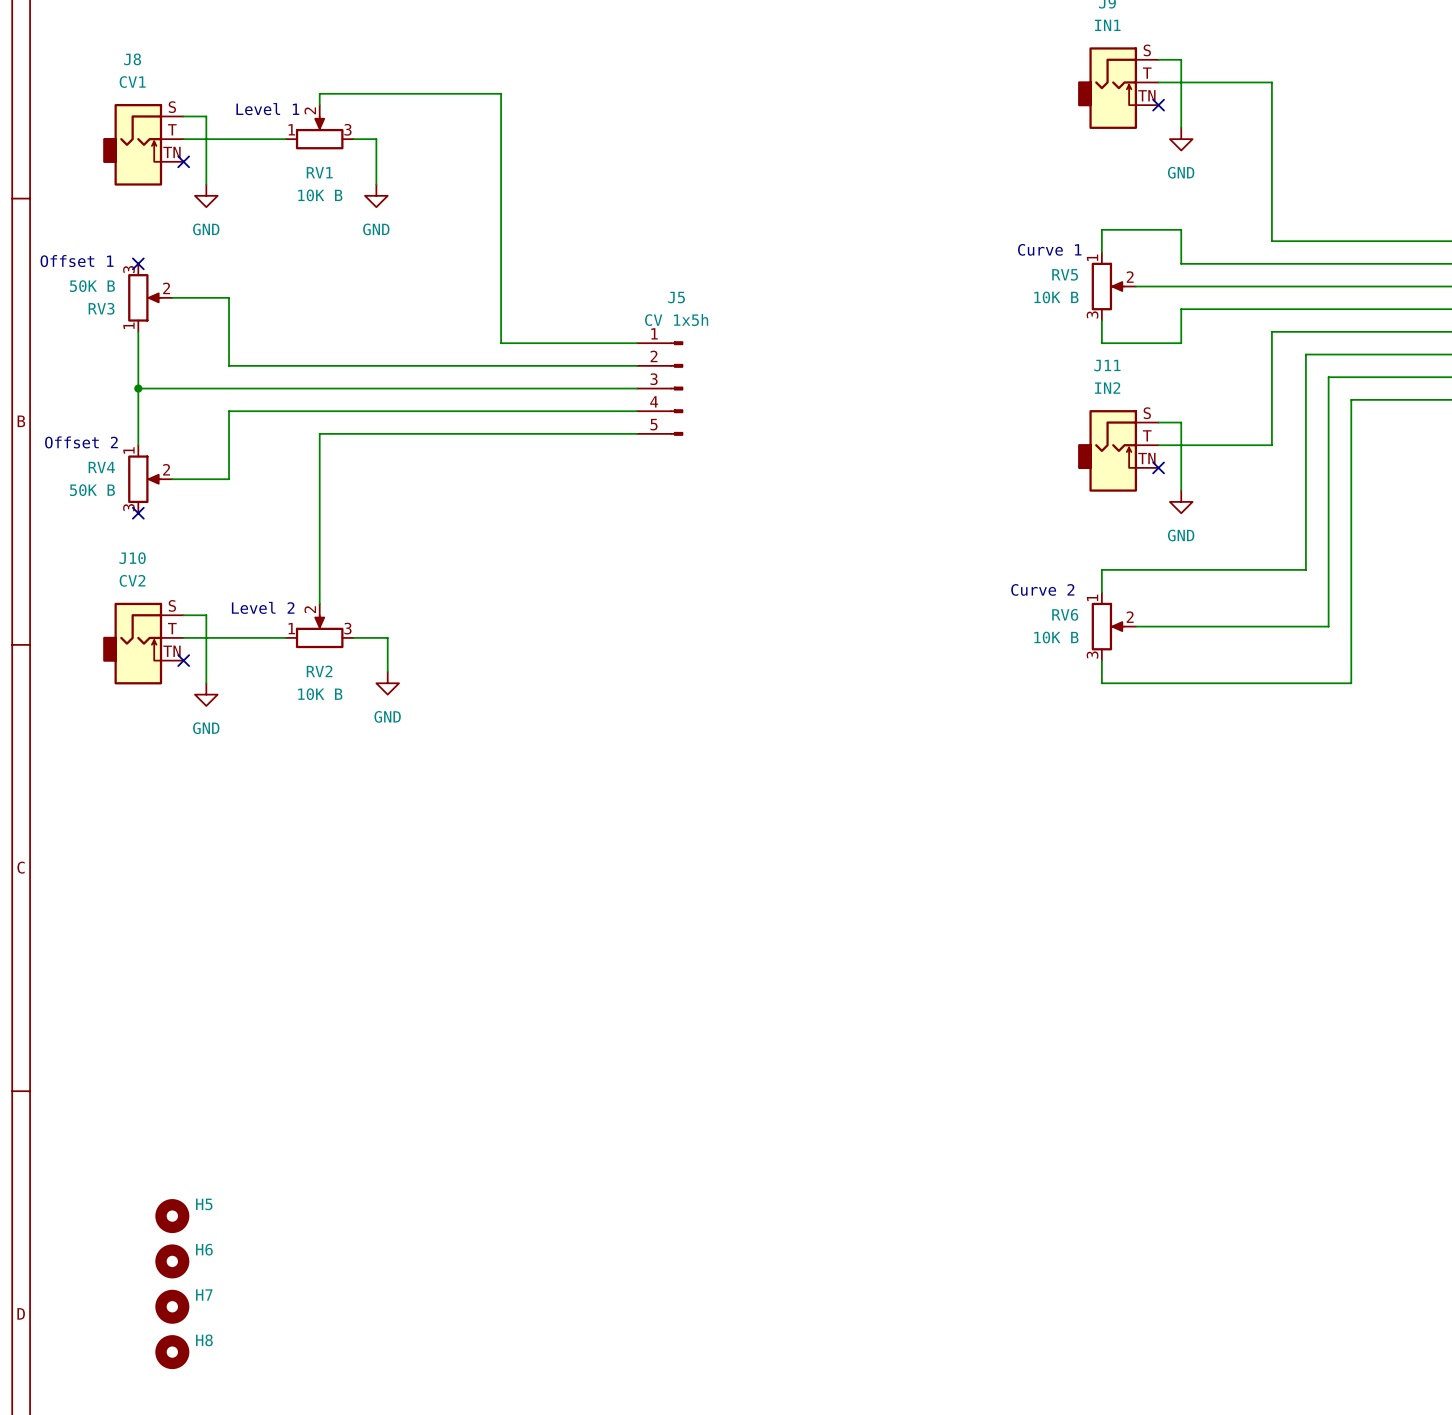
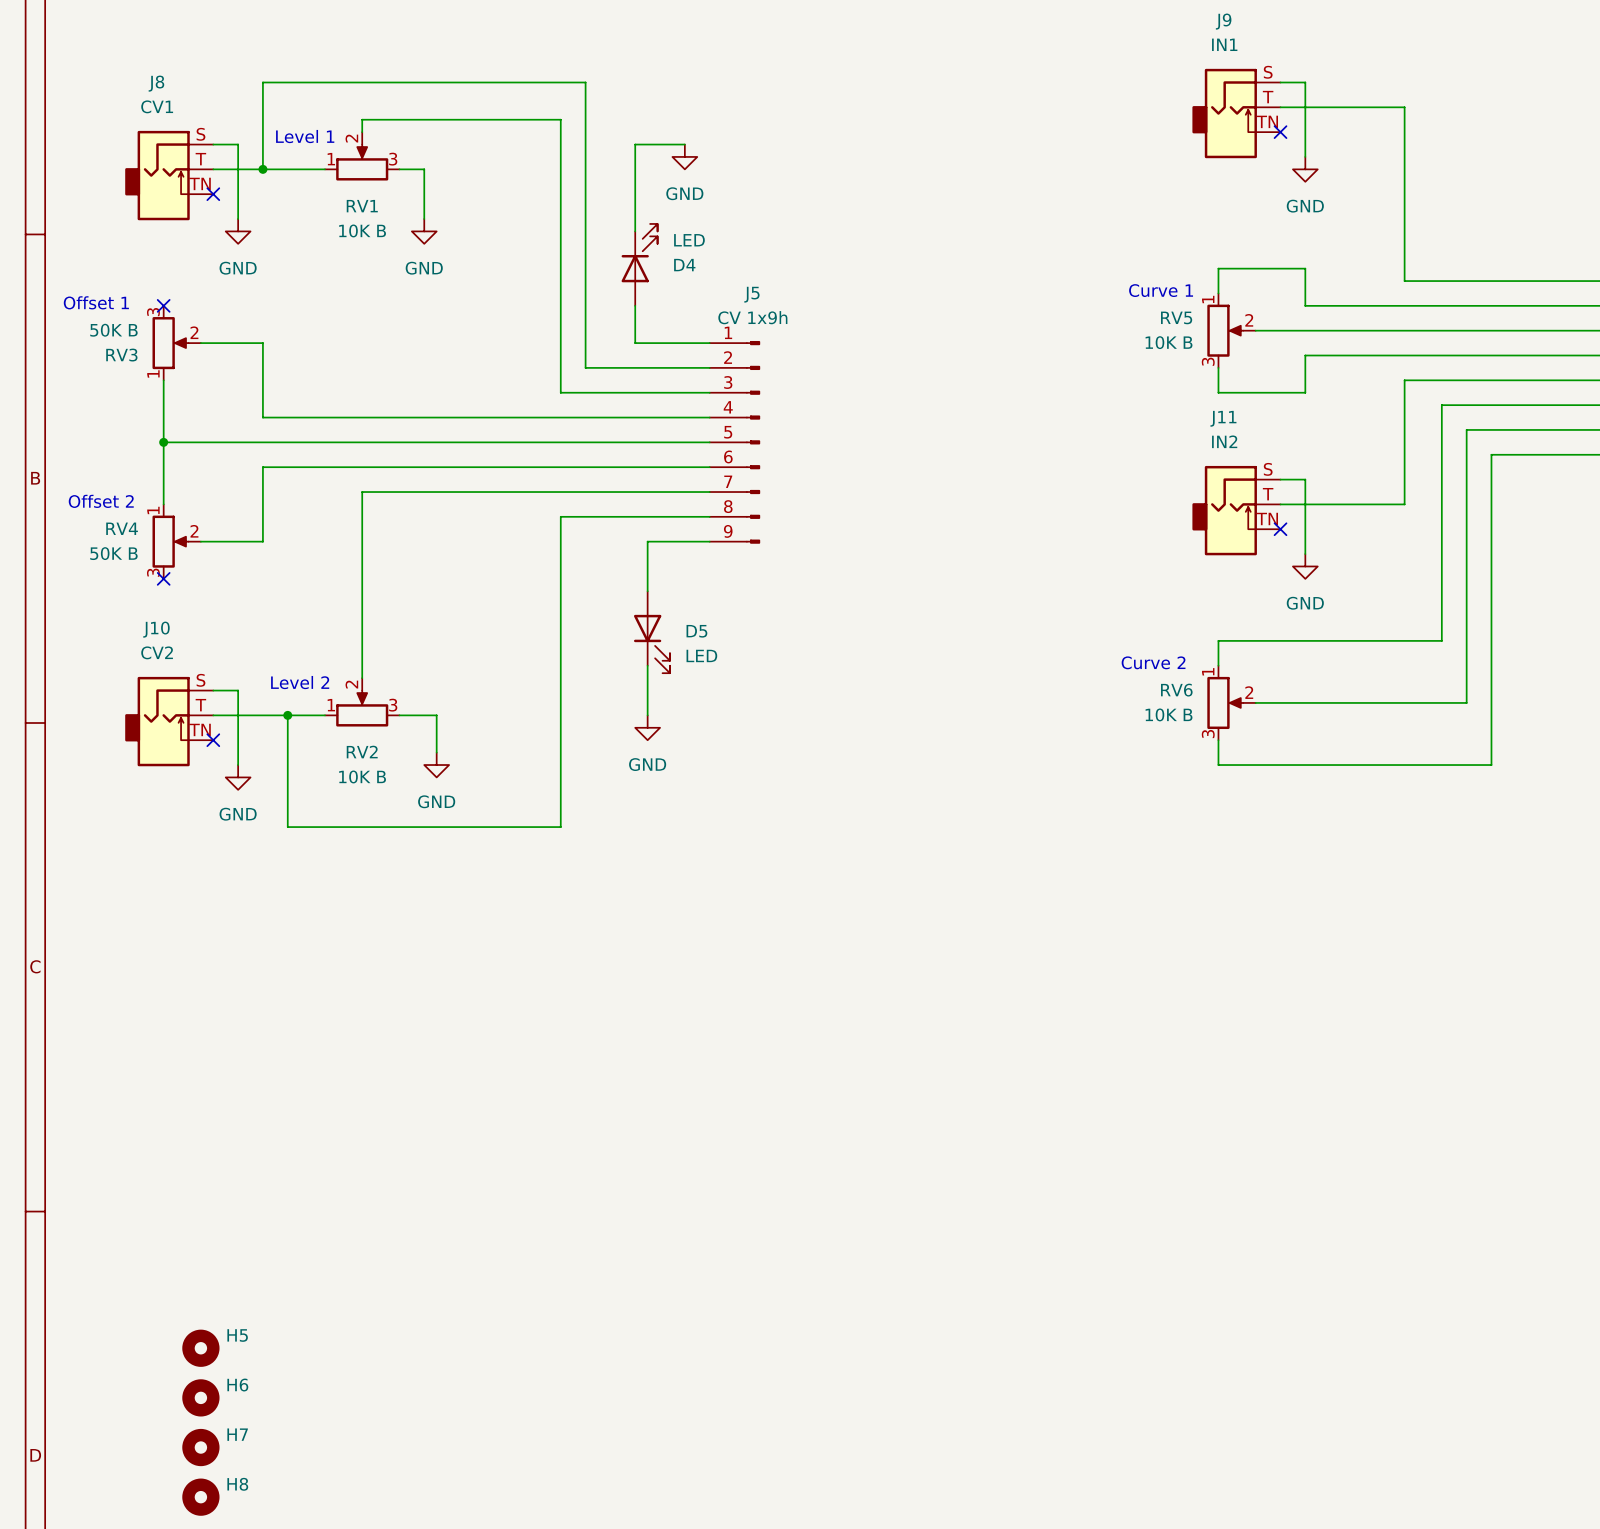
wire: none -> (684, 144) (635, 144) (635, 231)
power symbol: none -> GND (684, 156)
wire: none -> (262, 169) (262, 82) (585, 82) (585, 367) (709, 367)
junction: none -> (262, 169)
D4: none -> LED (639, 264)
wire: none -> (635, 305) (635, 343) (709, 343)
J5 name position: J5 (676, 297) -> J5 (751, 294)
J5 value: CV 1x5h (676, 319) -> CV 1x9h (752, 317)
J5 symbol: [637, 341, 684, 436] -> [709, 341, 761, 544]
wire: none -> (709, 516) (560, 516) (560, 827) (287, 827) (287, 715)
wire: none -> (709, 541) (647, 541) (647, 591)
D5: none -> LED (651, 632)
wire: none -> (647, 665) (647, 715)
junction: none -> (287, 715)
power symbol: none -> GND (647, 727)

